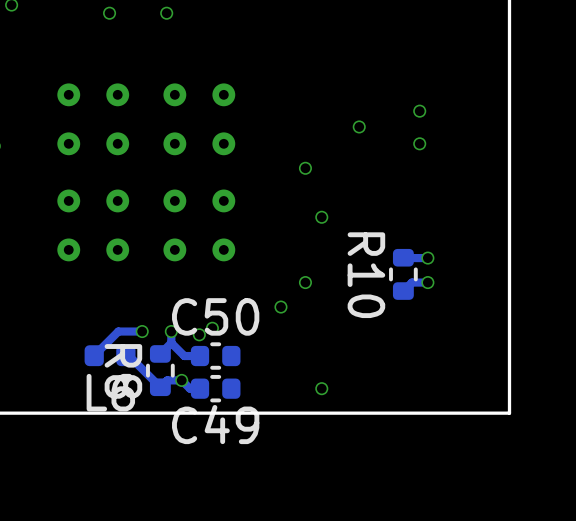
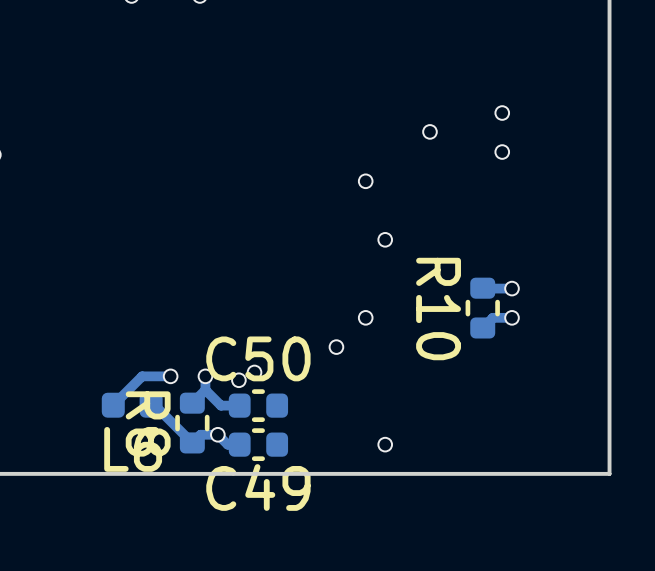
via: (68, 94) -> none
via: (117, 94) -> none
via: (174, 94) -> none
via: (223, 94) -> none
via: (68, 143) -> none
via: (117, 143) -> none
via: (174, 143) -> none
via: (223, 143) -> none
via: (68, 200) -> none
via: (117, 200) -> none
via: (174, 200) -> none
via: (223, 200) -> none
via: (68, 249) -> none
via: (117, 249) -> none
via: (174, 249) -> none
via: (223, 249) -> none

